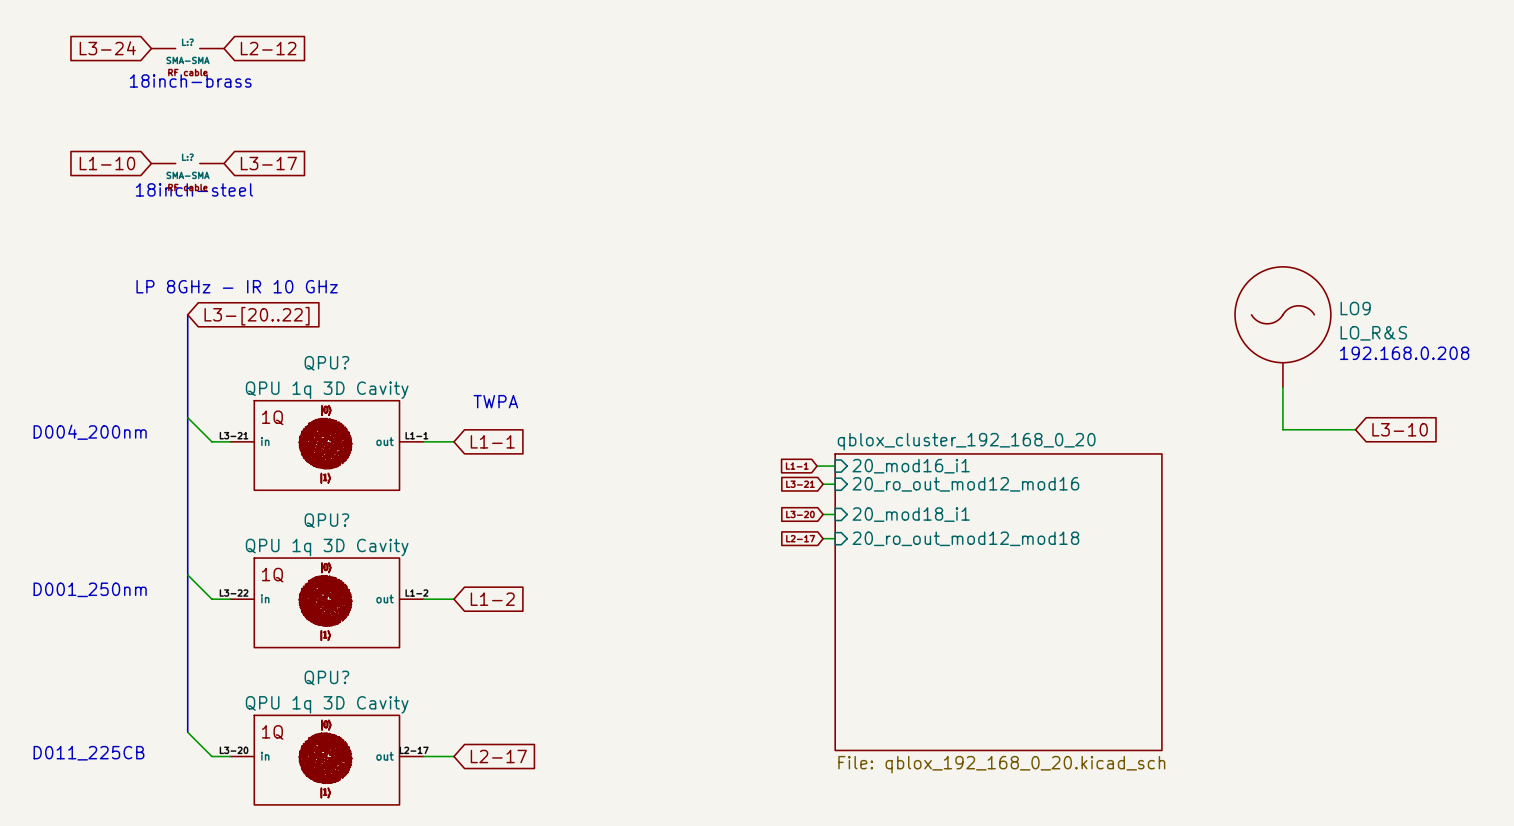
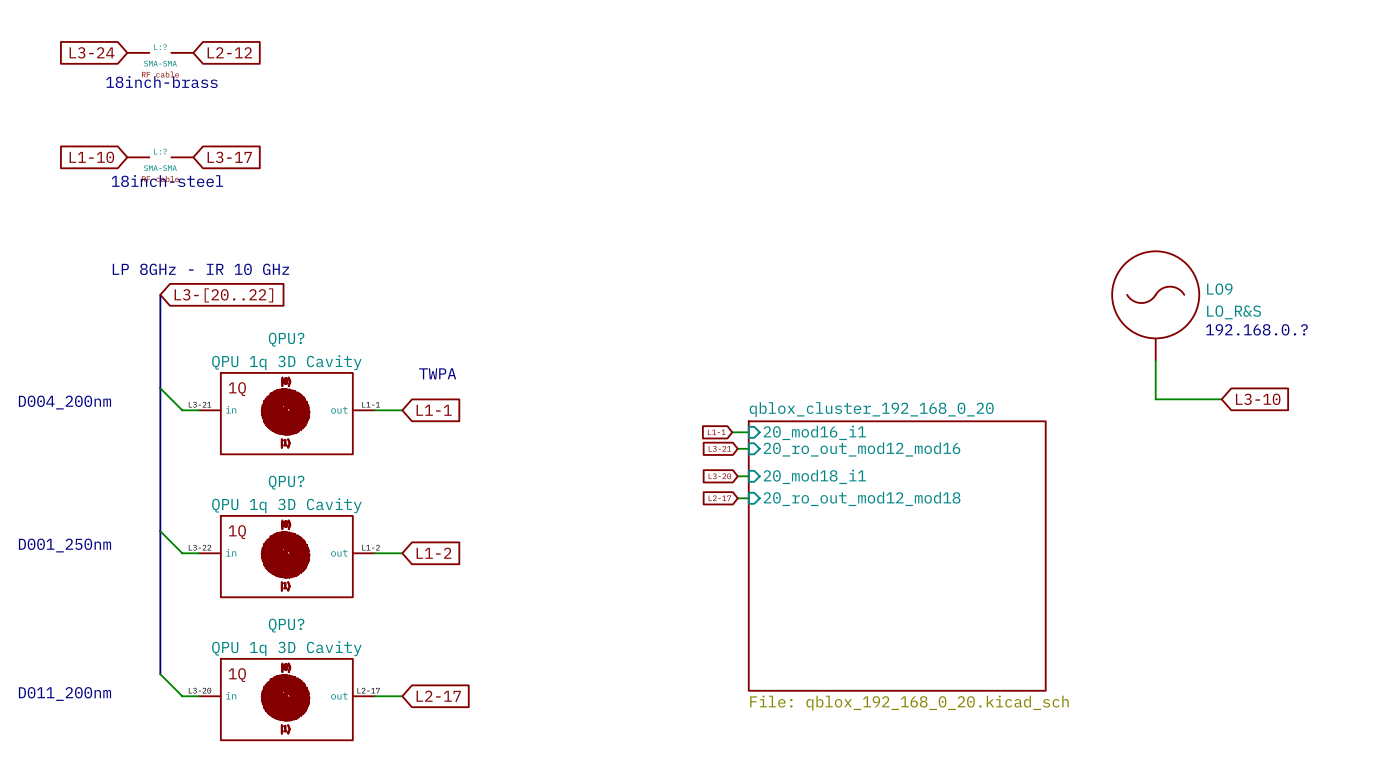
text: 192.168.0.208 (1404, 353) -> 192.168.0.? (1256, 329)
text: D011_225CB (88, 753) -> D011_200nm (64, 694)

